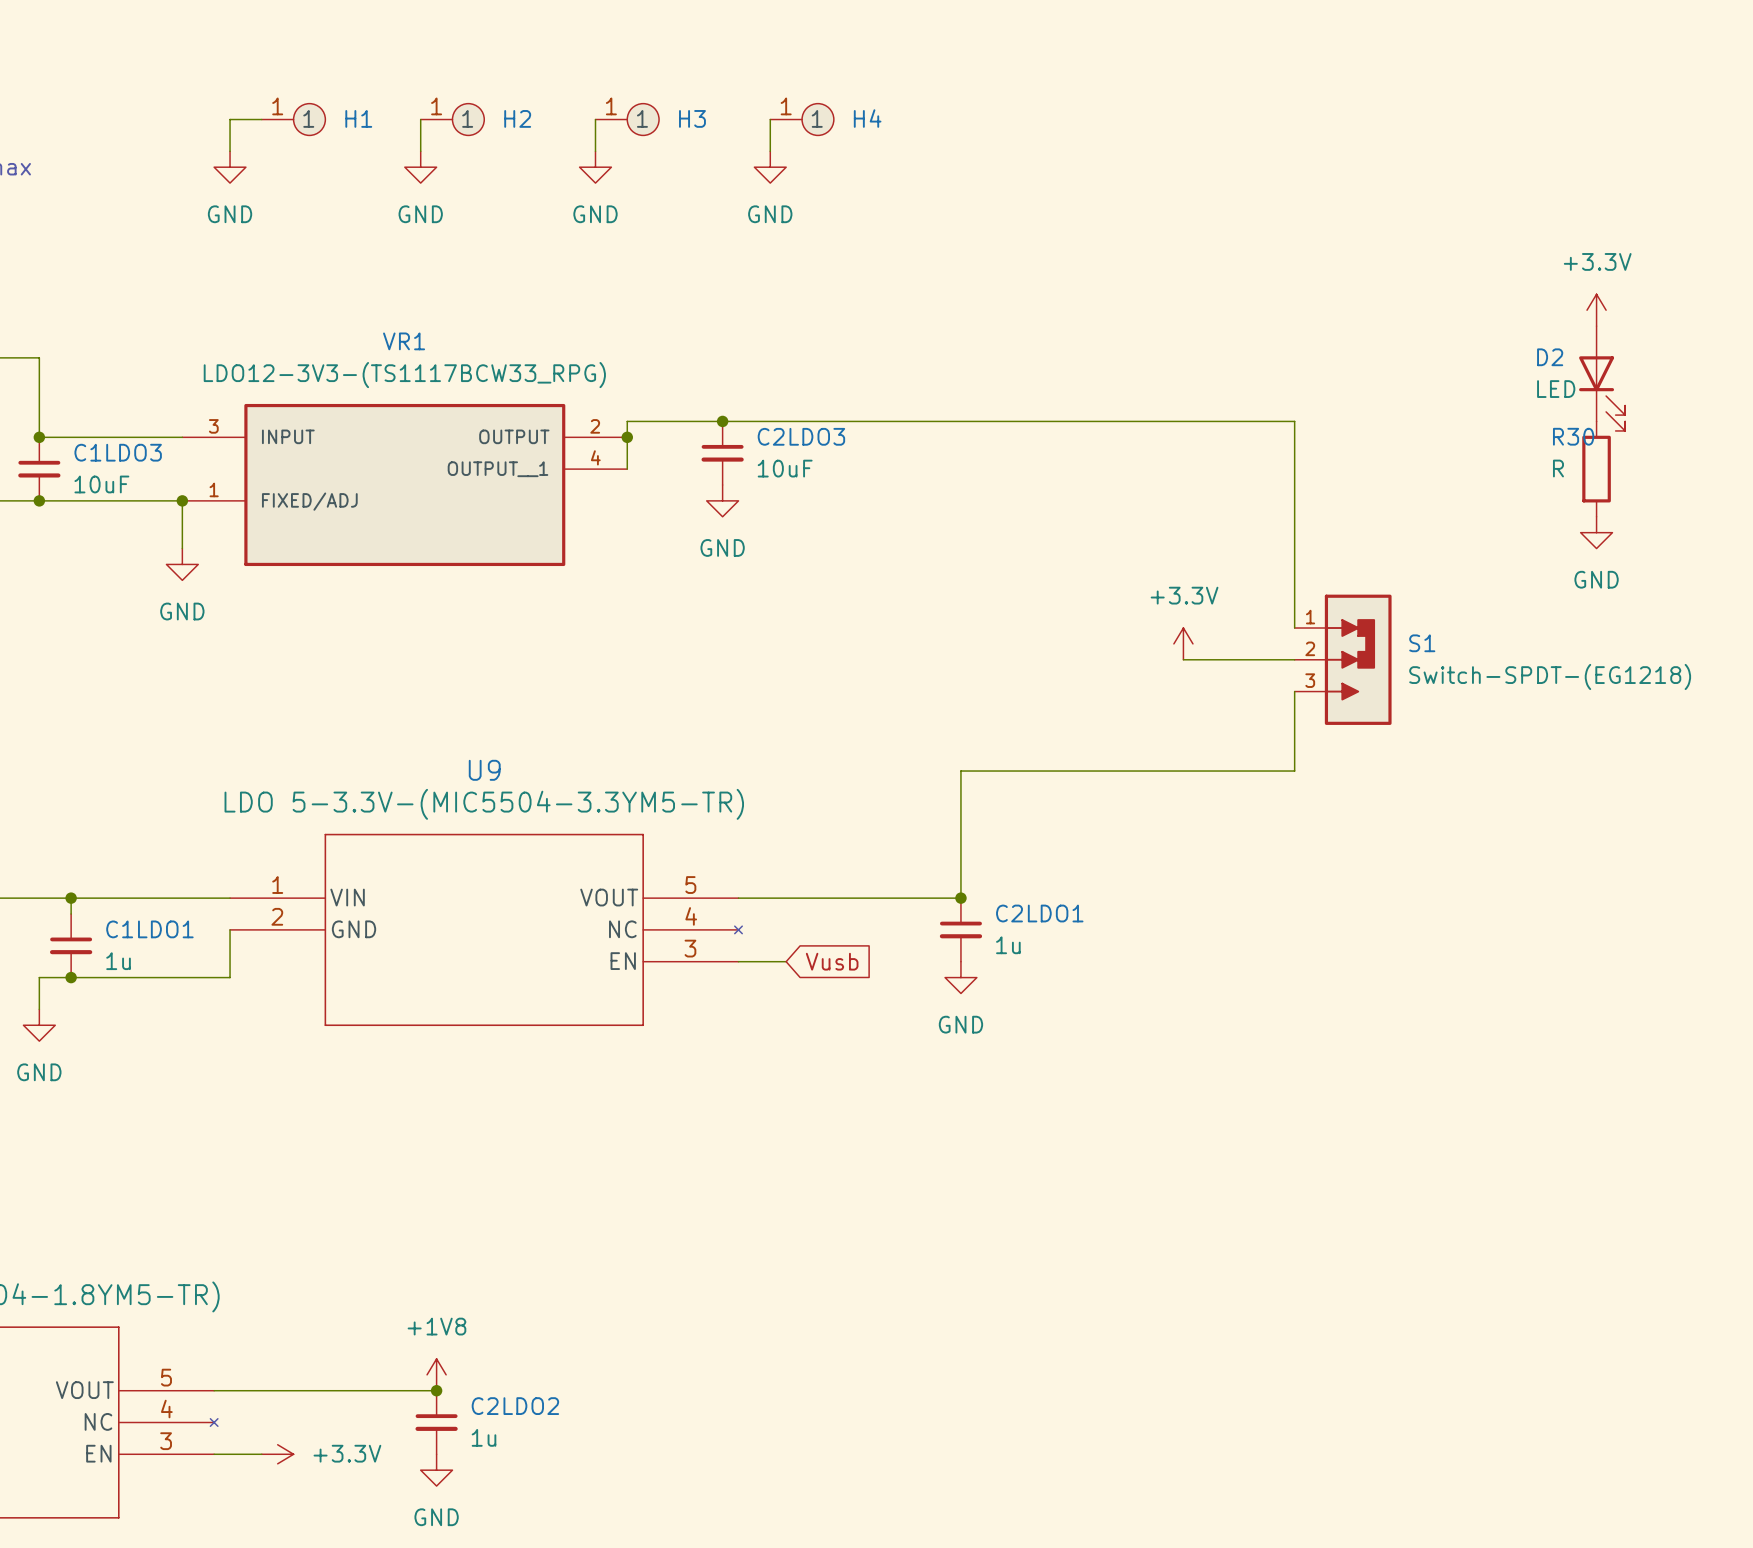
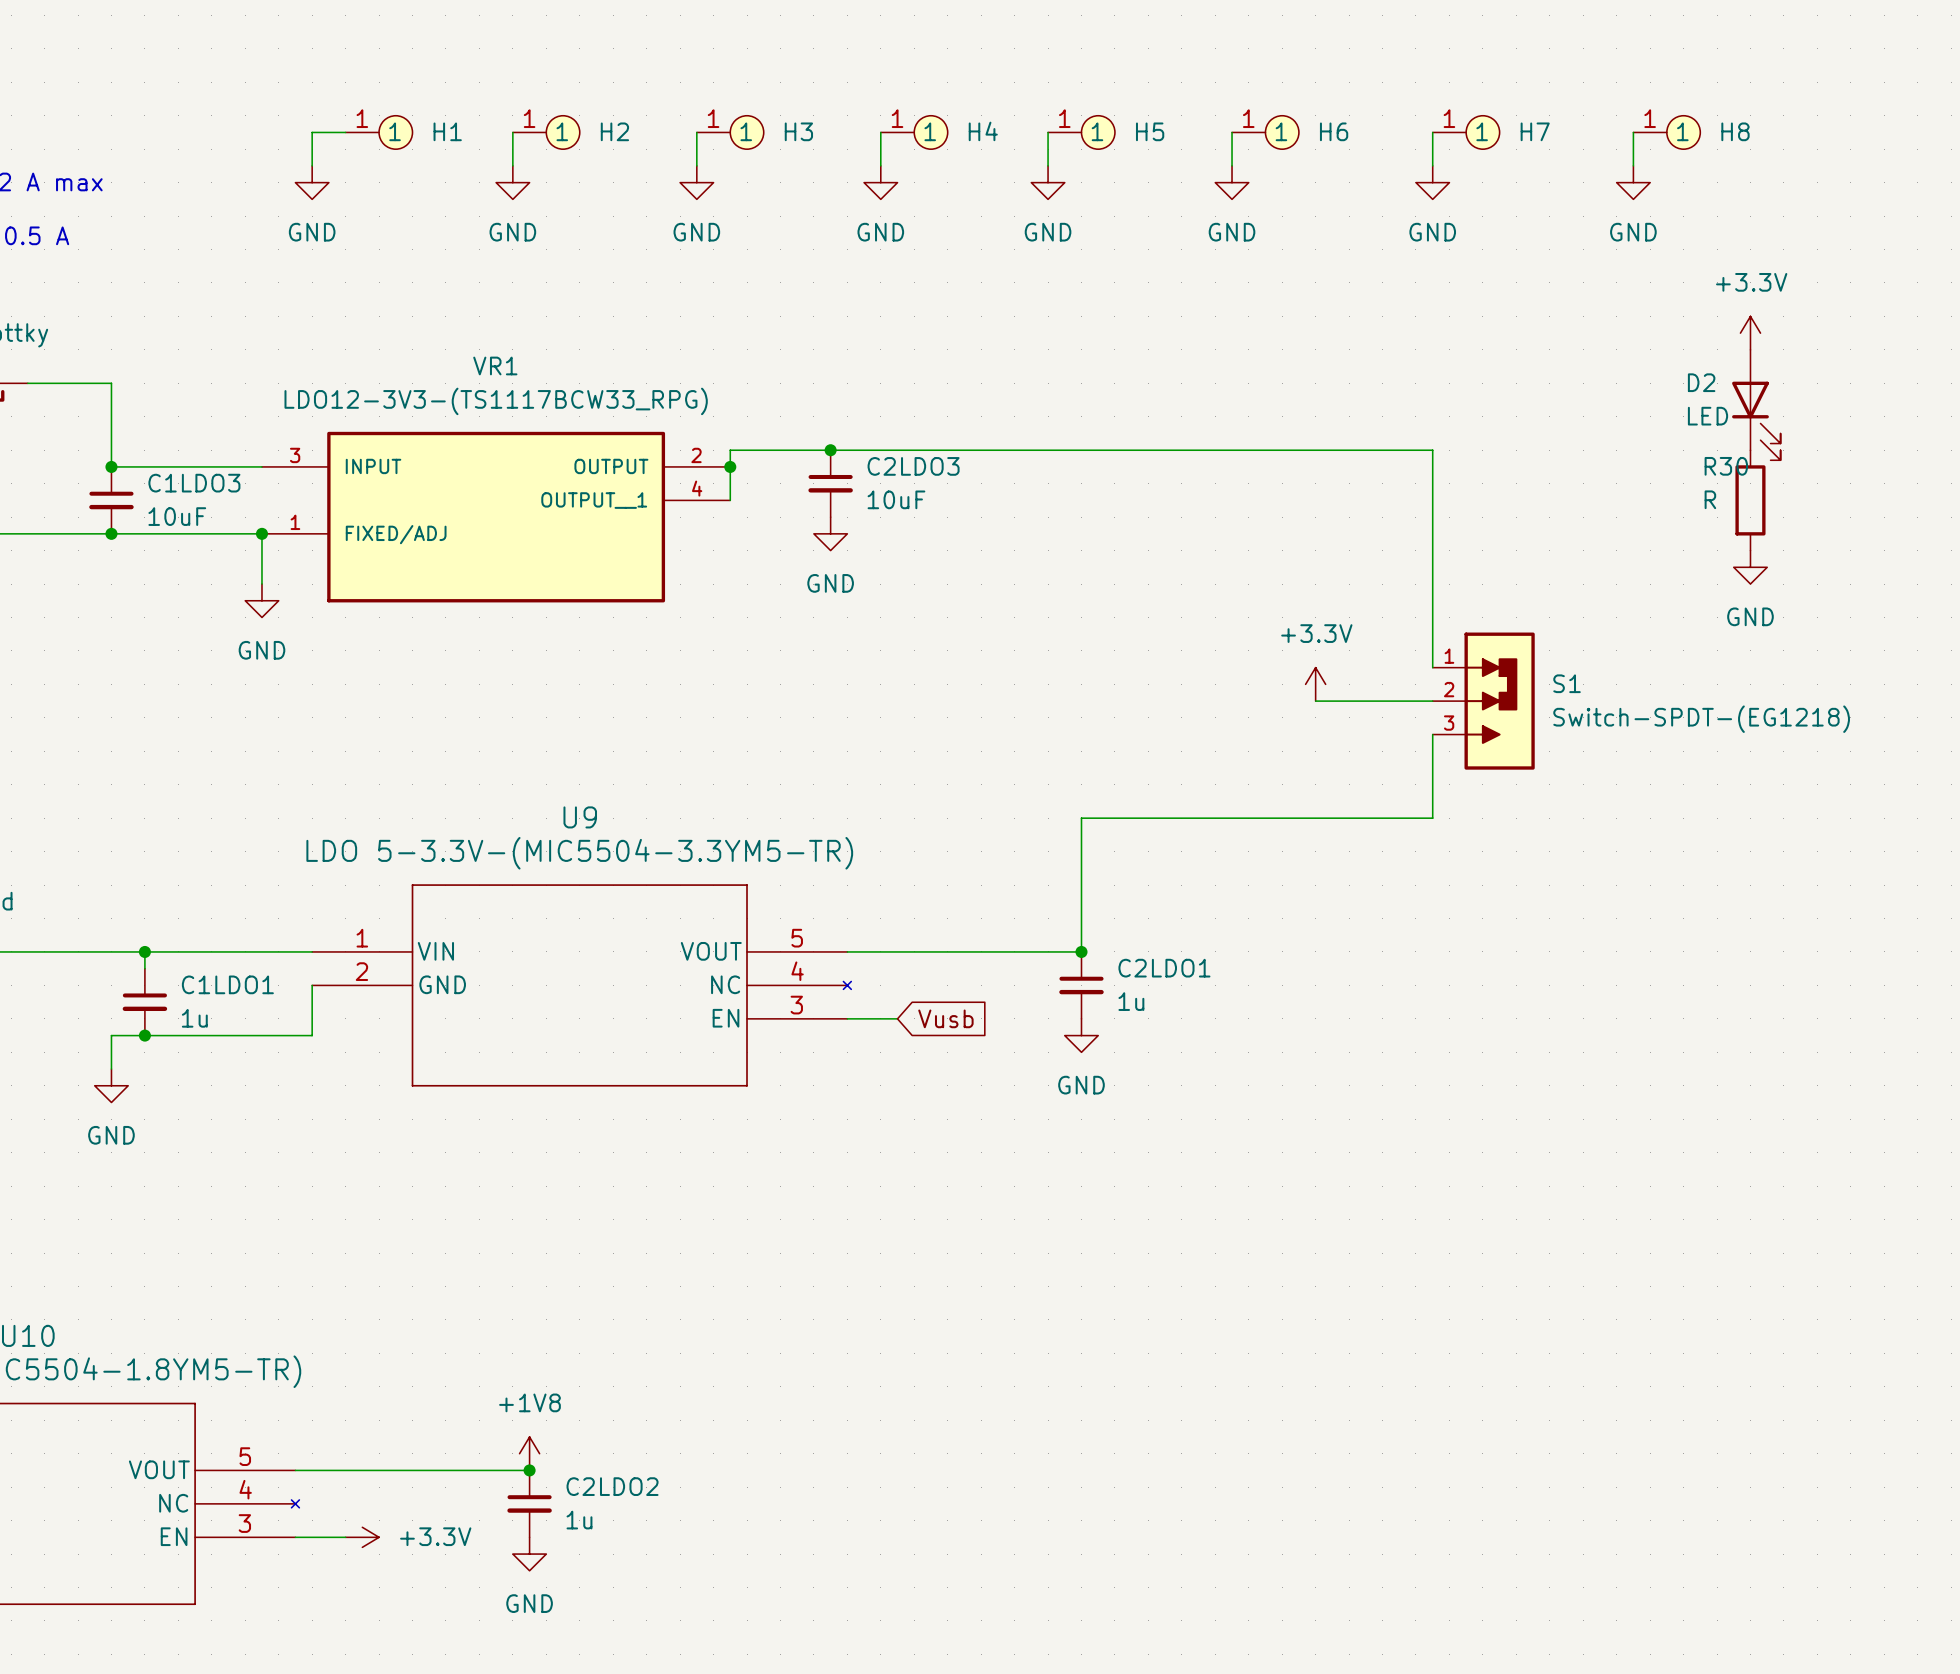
wire: none -> (1048, 132) (1048, 165)
H5: none -> (1081, 132)
wire: none -> (1232, 132) (1232, 165)
H6: none -> (1265, 132)
wire: none -> (1432, 132) (1432, 165)
H7: none -> (1466, 132)
wire: none -> (1633, 132) (1633, 165)
H8: none -> (1666, 132)
power symbol: none -> GND (1048, 182)
power symbol: none -> GND (1232, 182)
power symbol: none -> GND (1432, 182)
power symbol: none -> GND (1633, 182)

